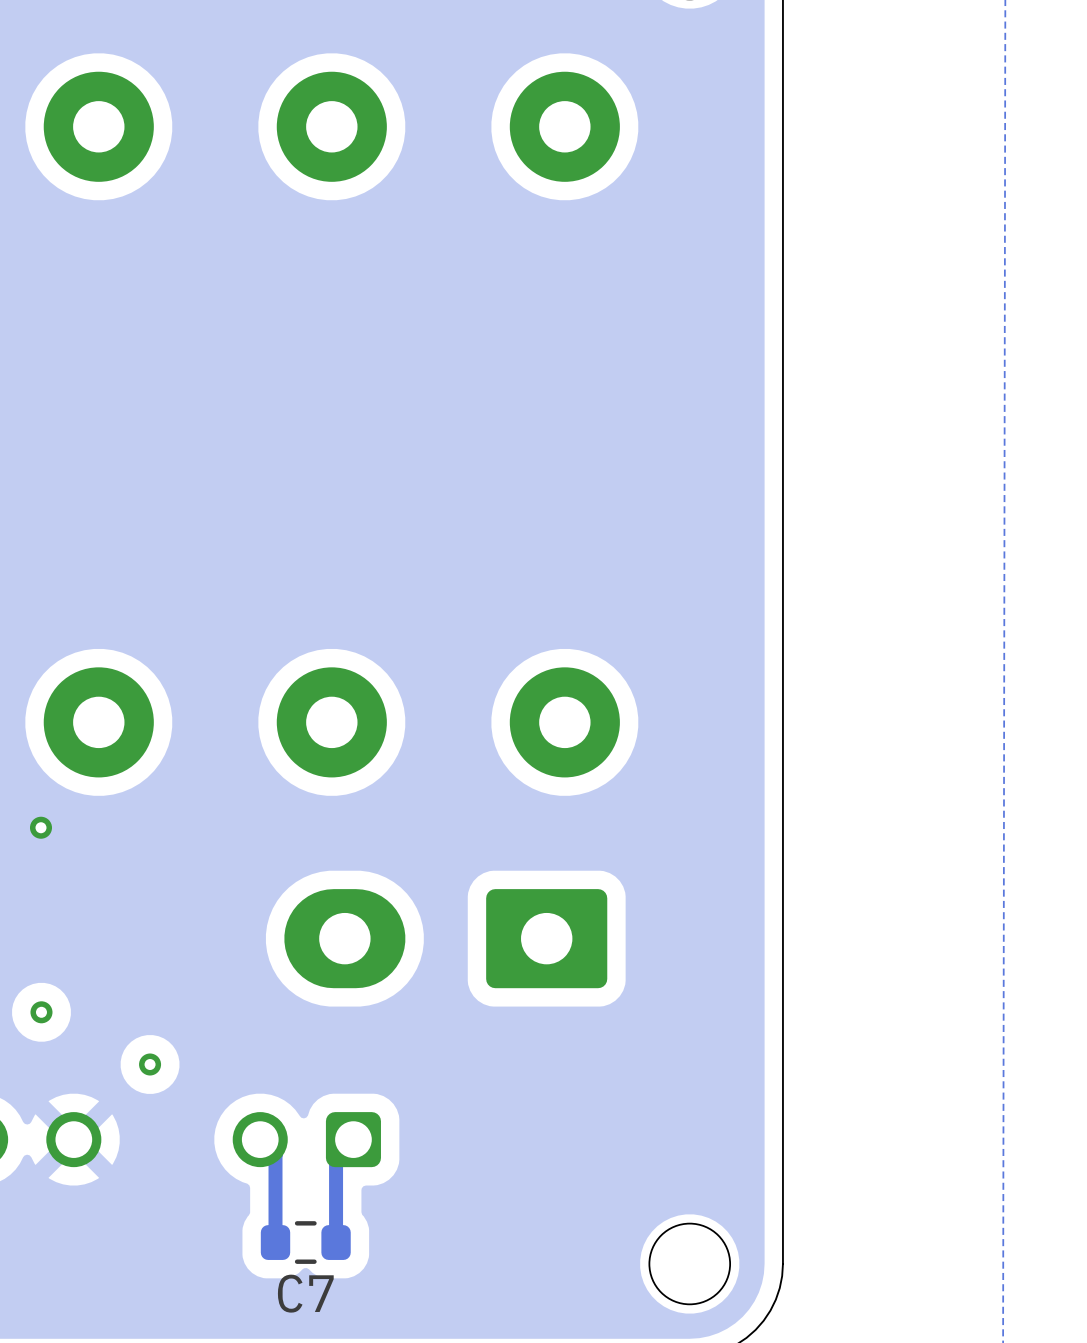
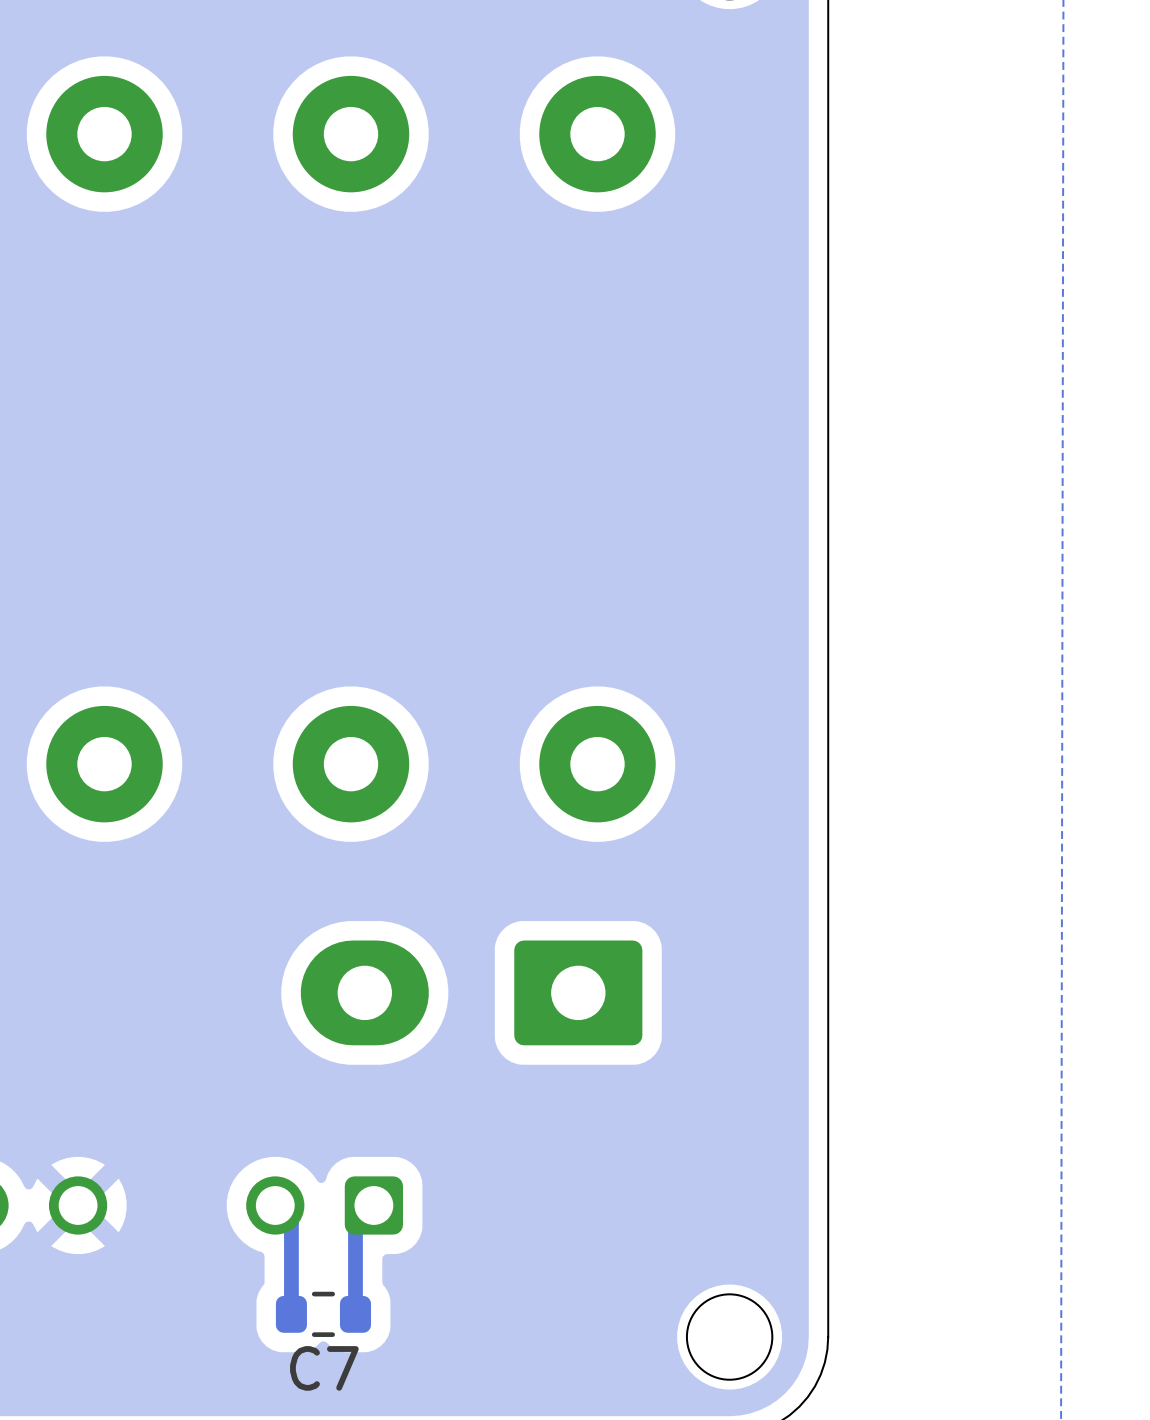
via: (41, 827) -> none
via: (41, 1012) -> none
via: (150, 1064) -> none

